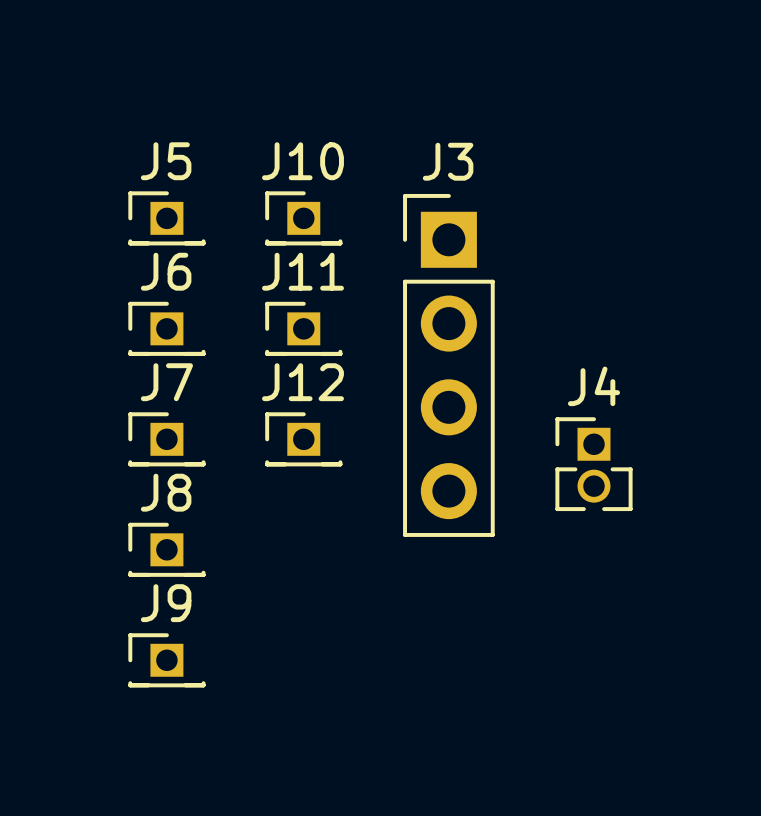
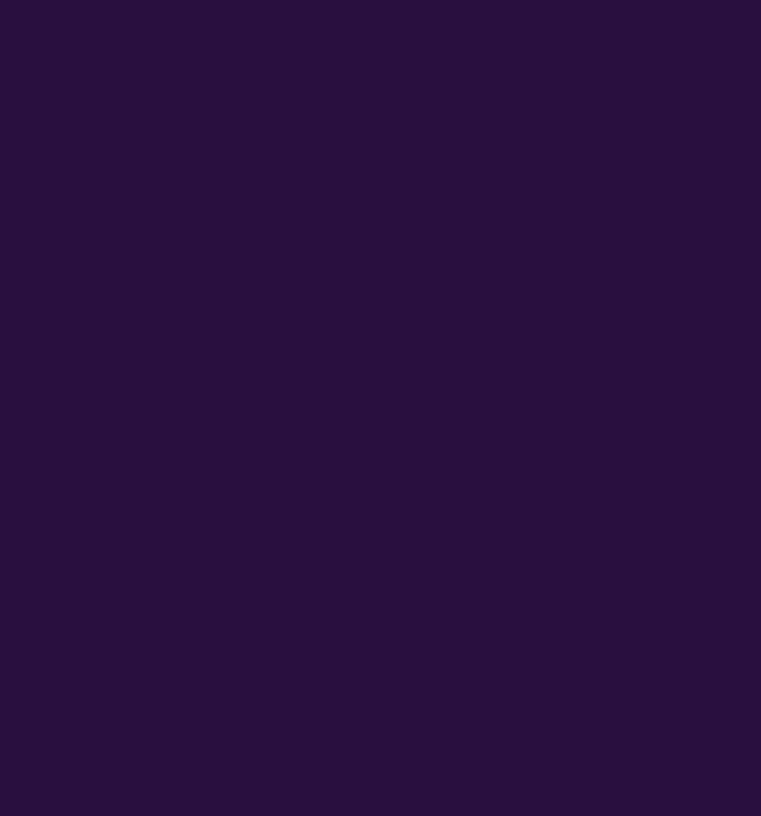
J5: (166, 218) -> none
J10: (303, 218) -> none
J6: (166, 328) -> none
J11: (303, 328) -> none
J3: (448, 365) -> none
J7: (166, 439) -> none
J12: (303, 439) -> none
J4: (594, 464) -> none
J8: (166, 549) -> none
J9: (166, 660) -> none

